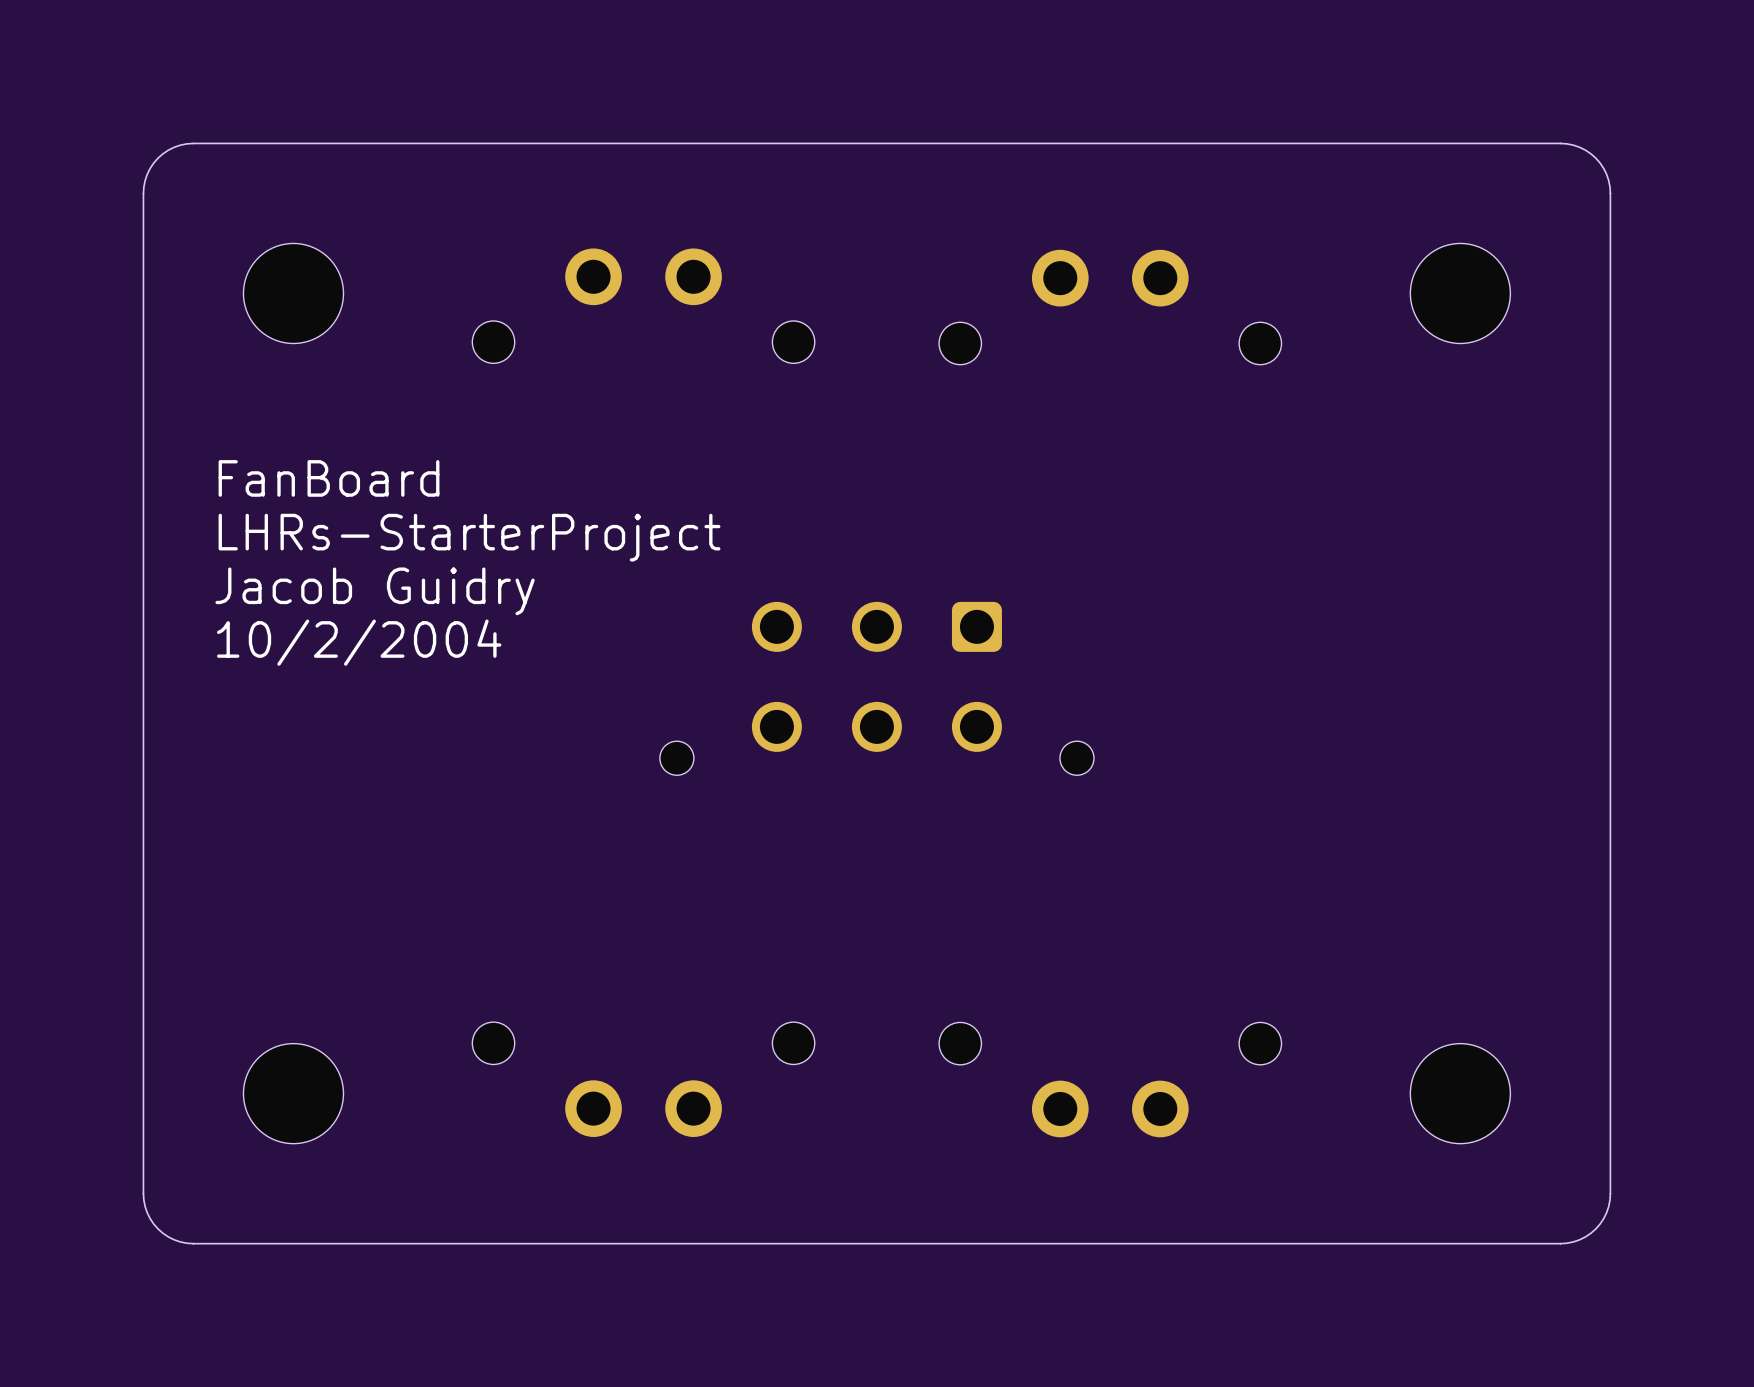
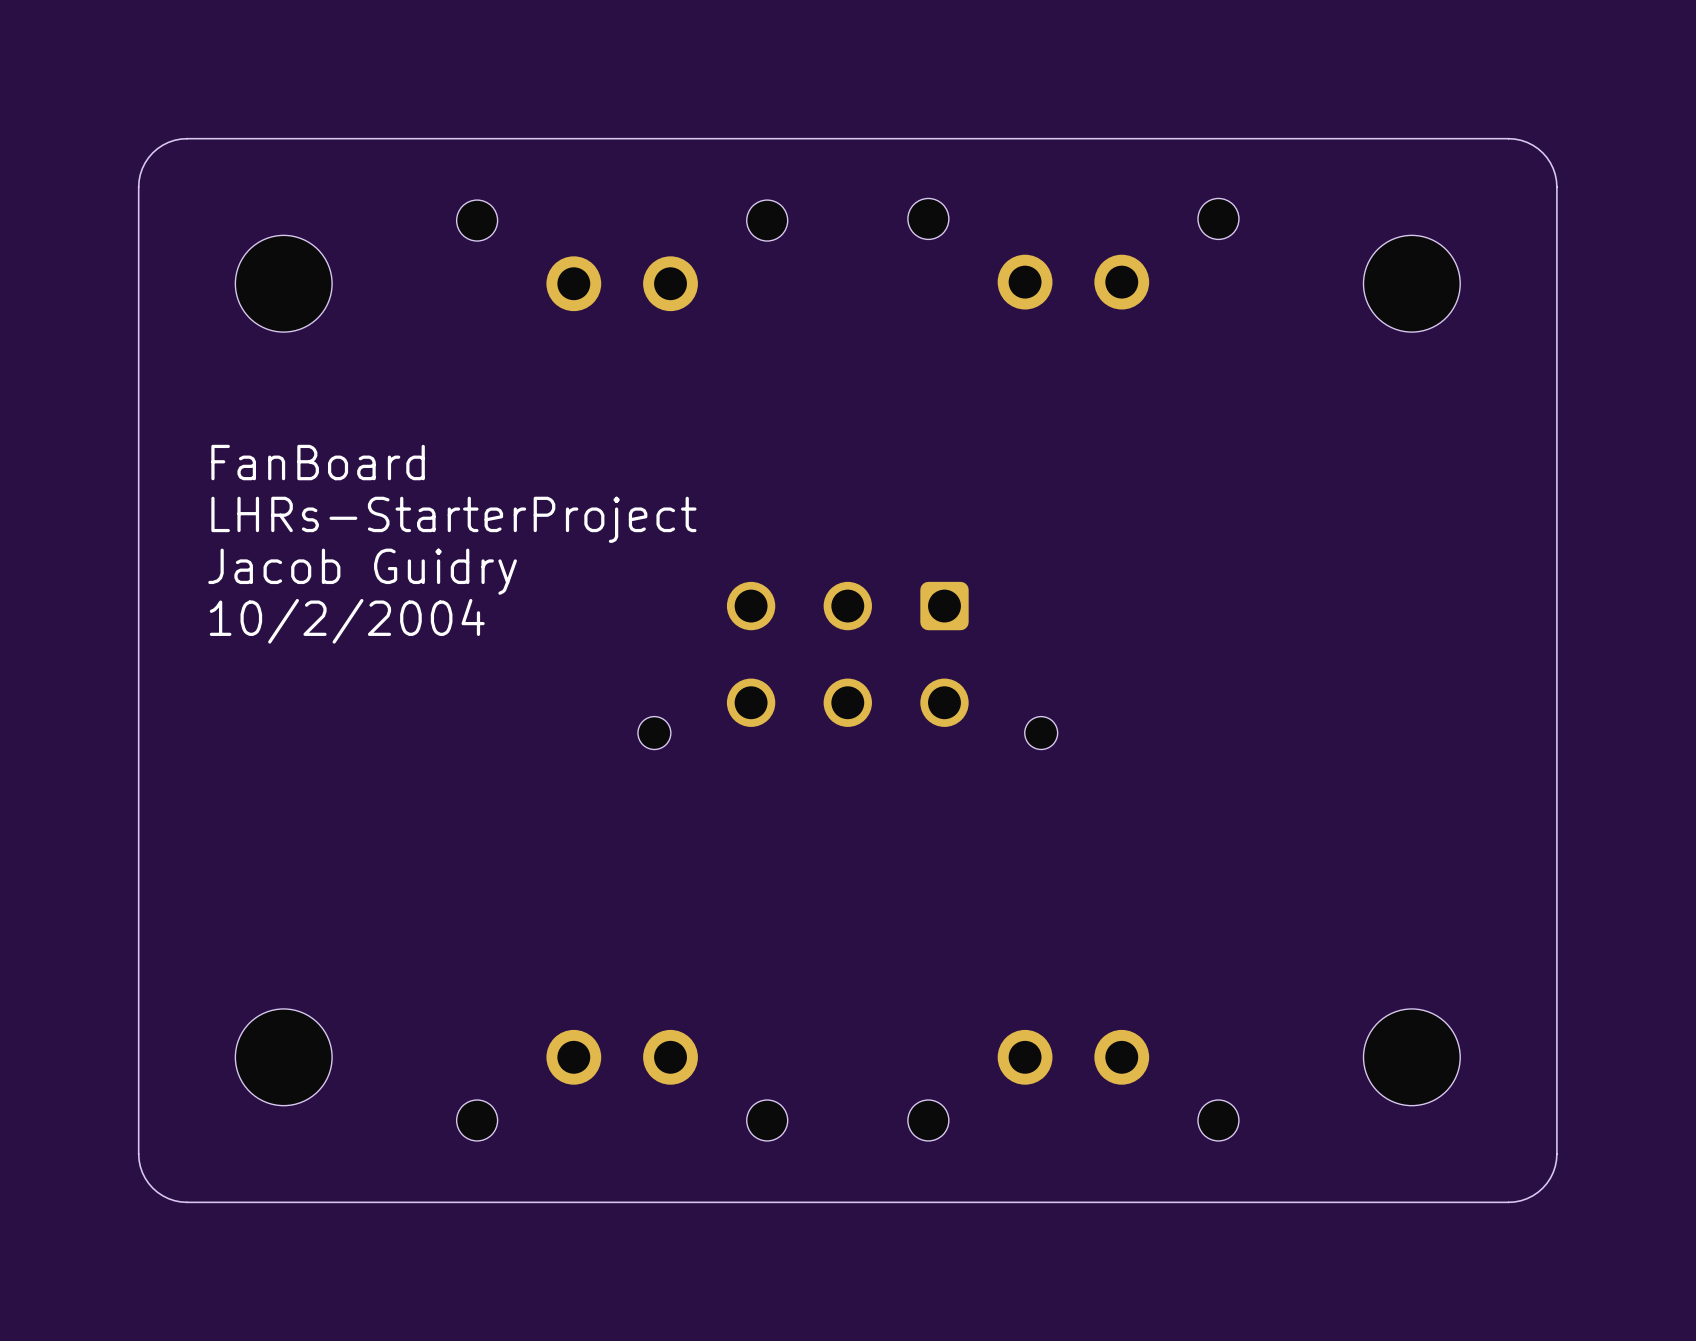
part rotation: 0° (643, 305) -> 180° (622, 255)
part rotation: 0° (1110, 307) -> 180° (1073, 253)
part rotation: 0° (643, 1079) -> 180° (622, 1085)
part rotation: 0° (1110, 1079) -> 180° (1073, 1085)

